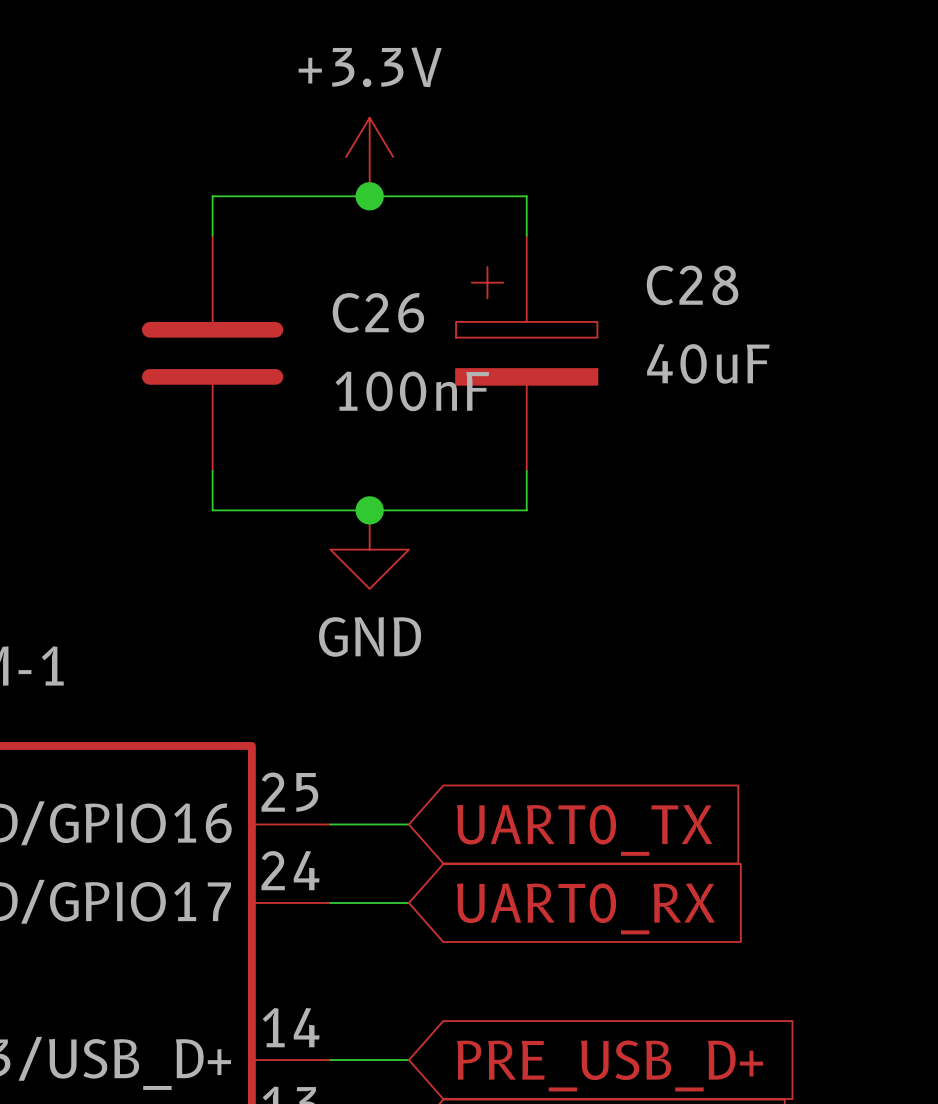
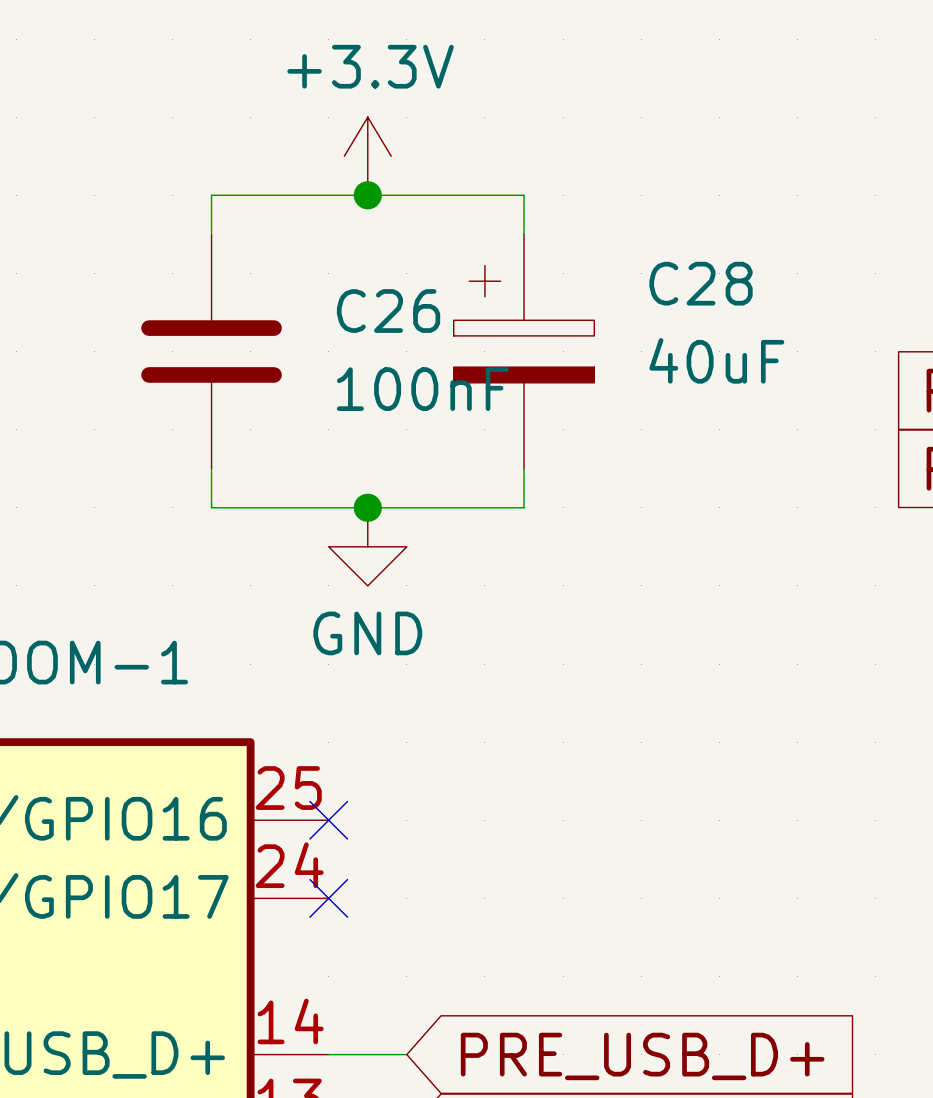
wire: (330, 824) (408, 824) -> none
no-connect mark: none -> (328, 820)
global label: UART0_TX (584, 830) -> none
wire: (330, 902) (408, 902) -> none
no-connect mark: none -> (328, 898)
global label: UART0_RX (585, 908) -> none

